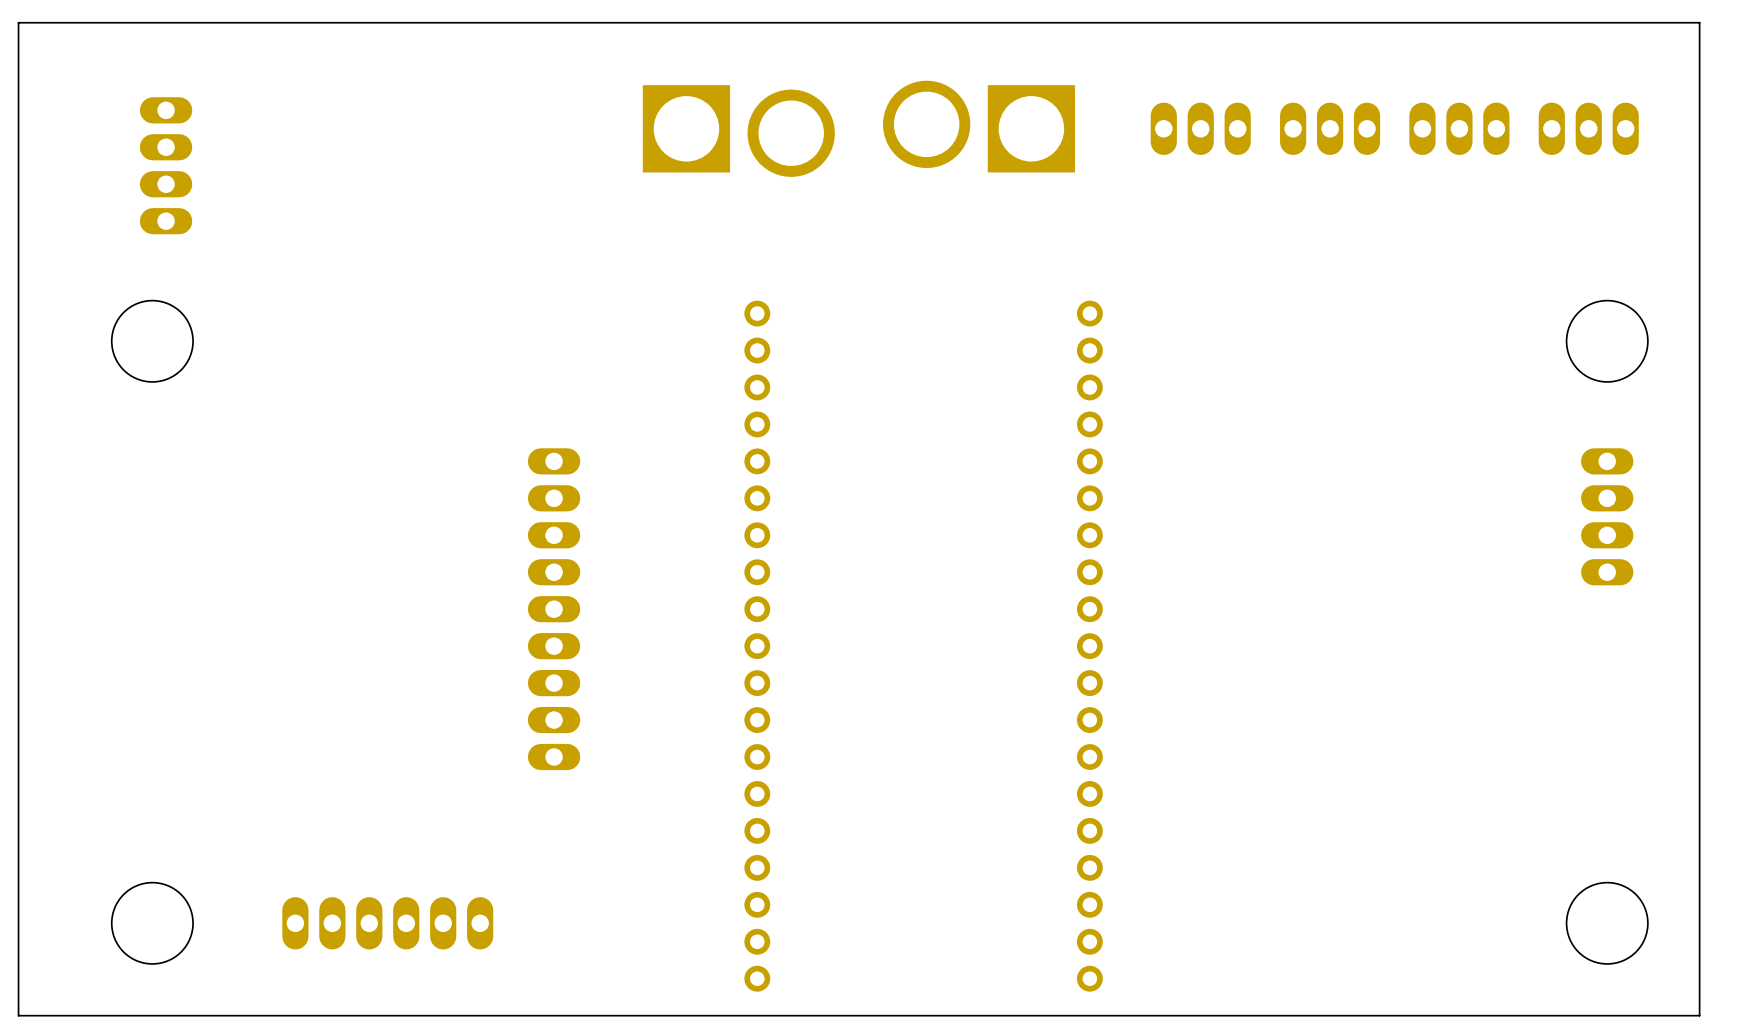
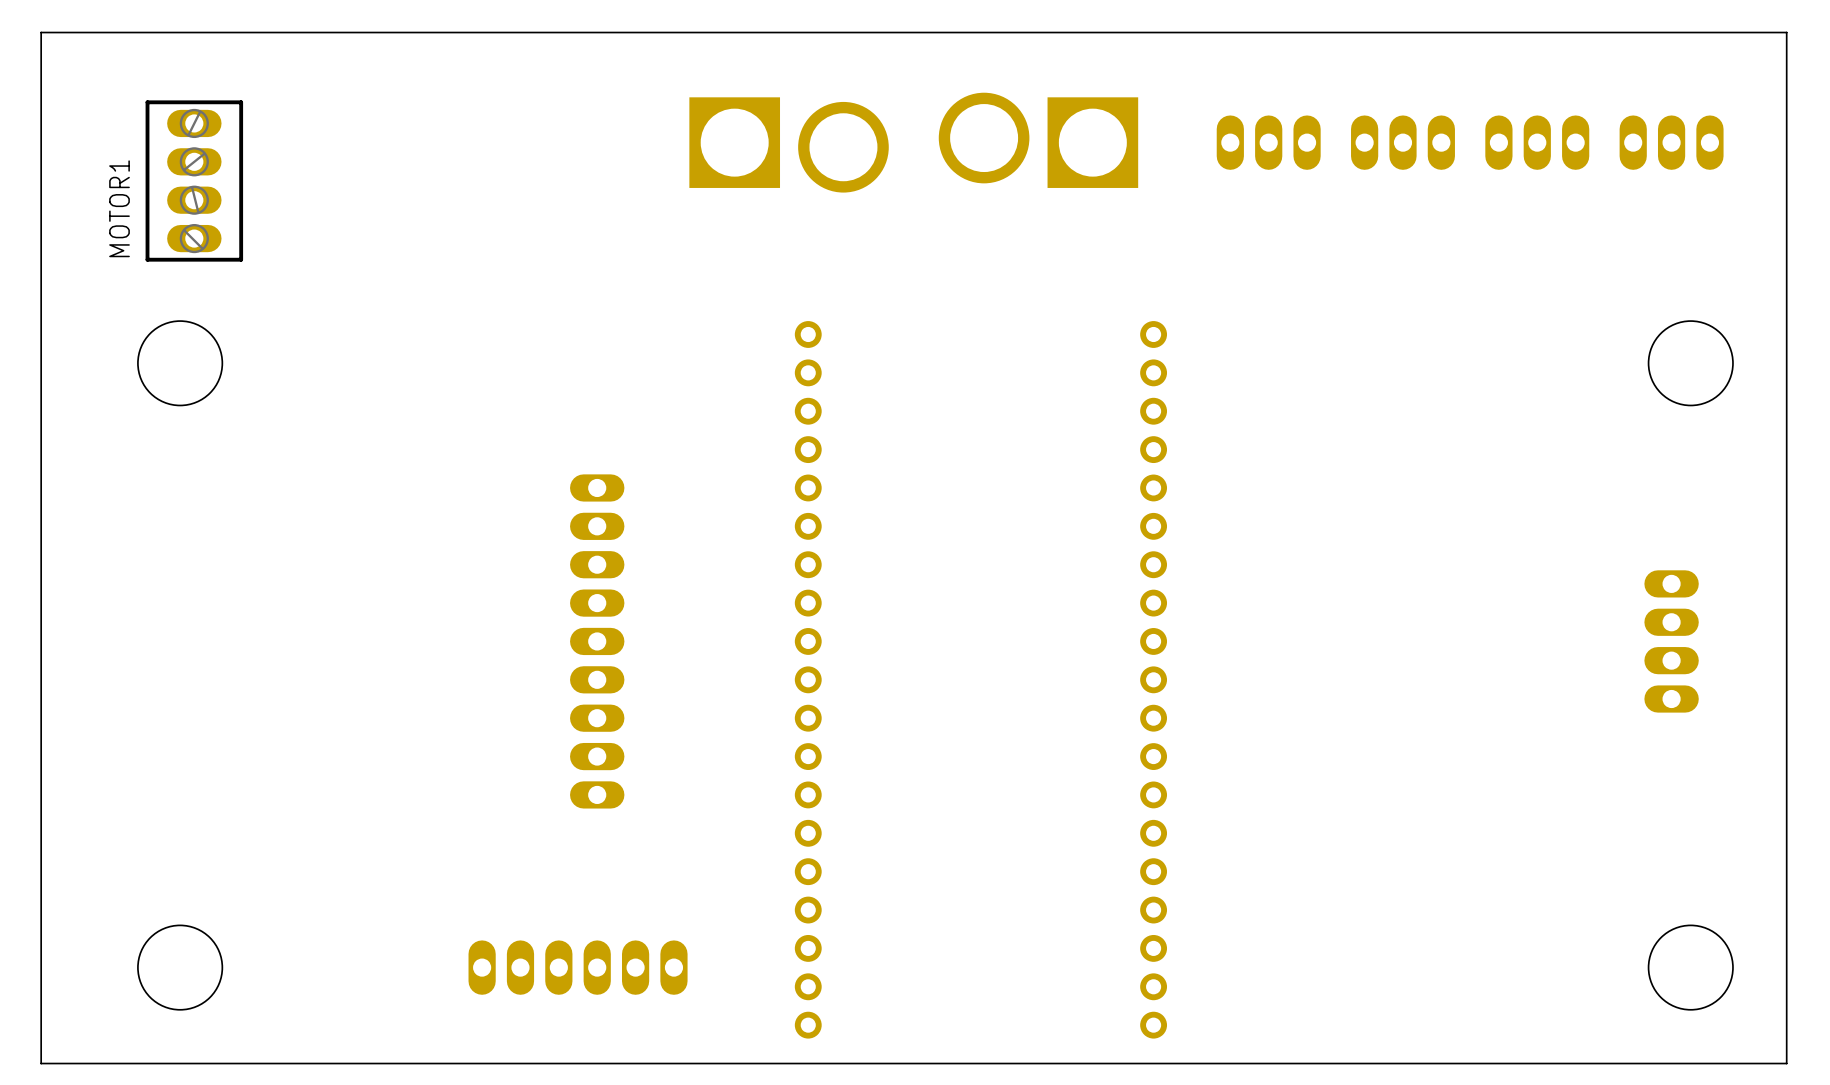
MOTOR1 side: top (166, 165) -> bottom (194, 181)
part position: (1607, 516) -> (1671, 641)
part position: (387, 923) -> (578, 967)

